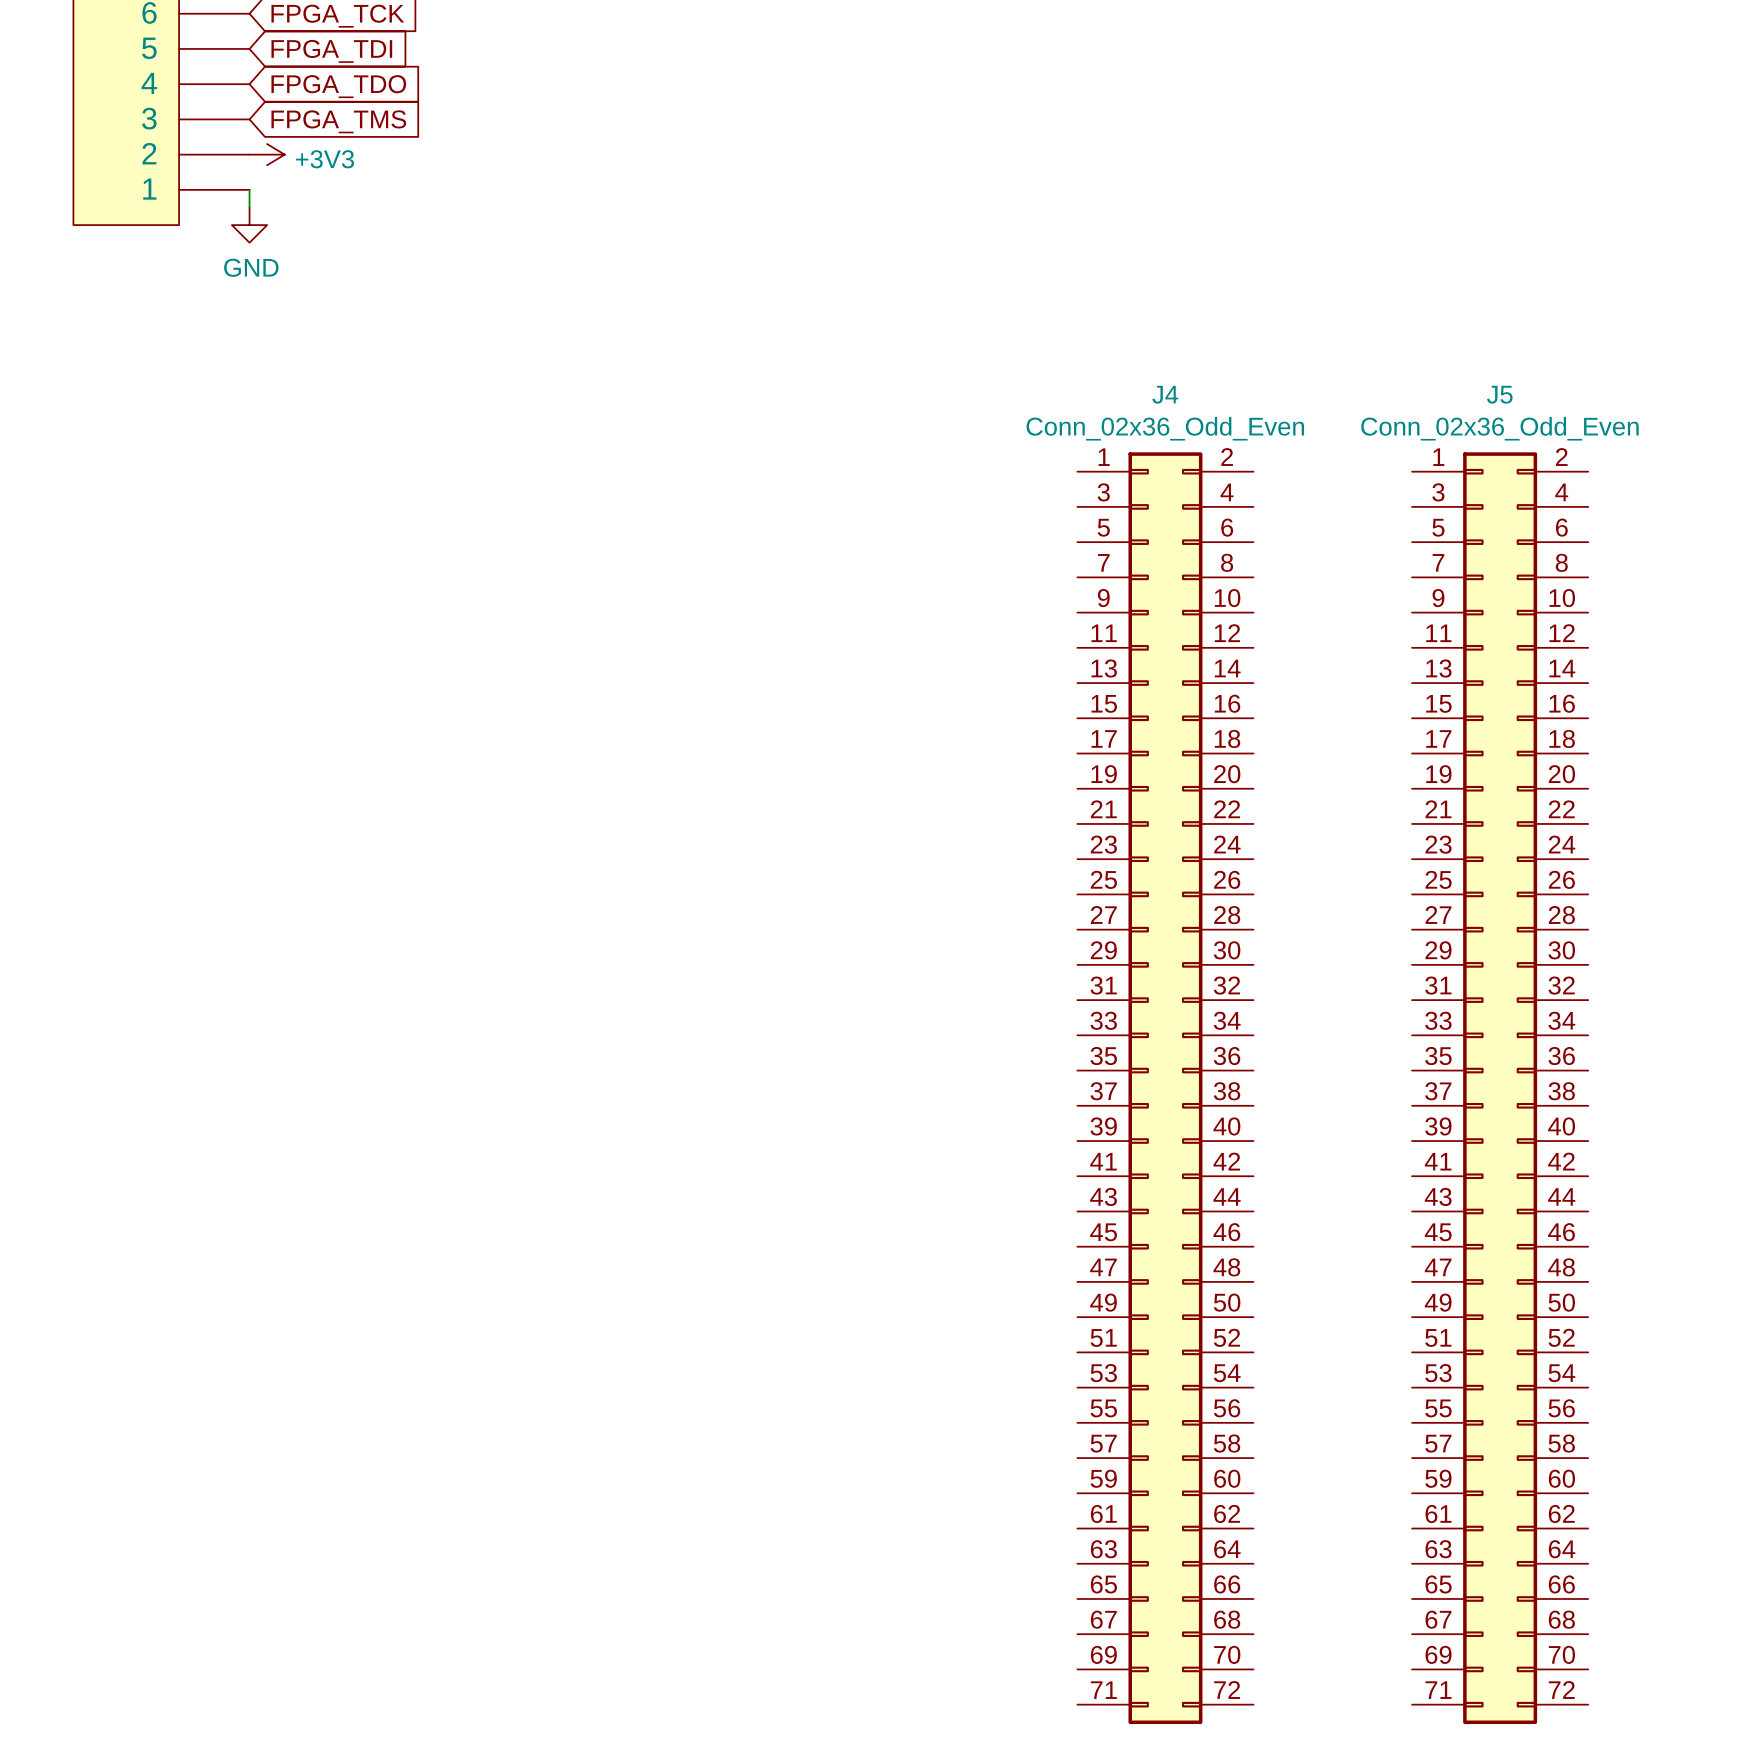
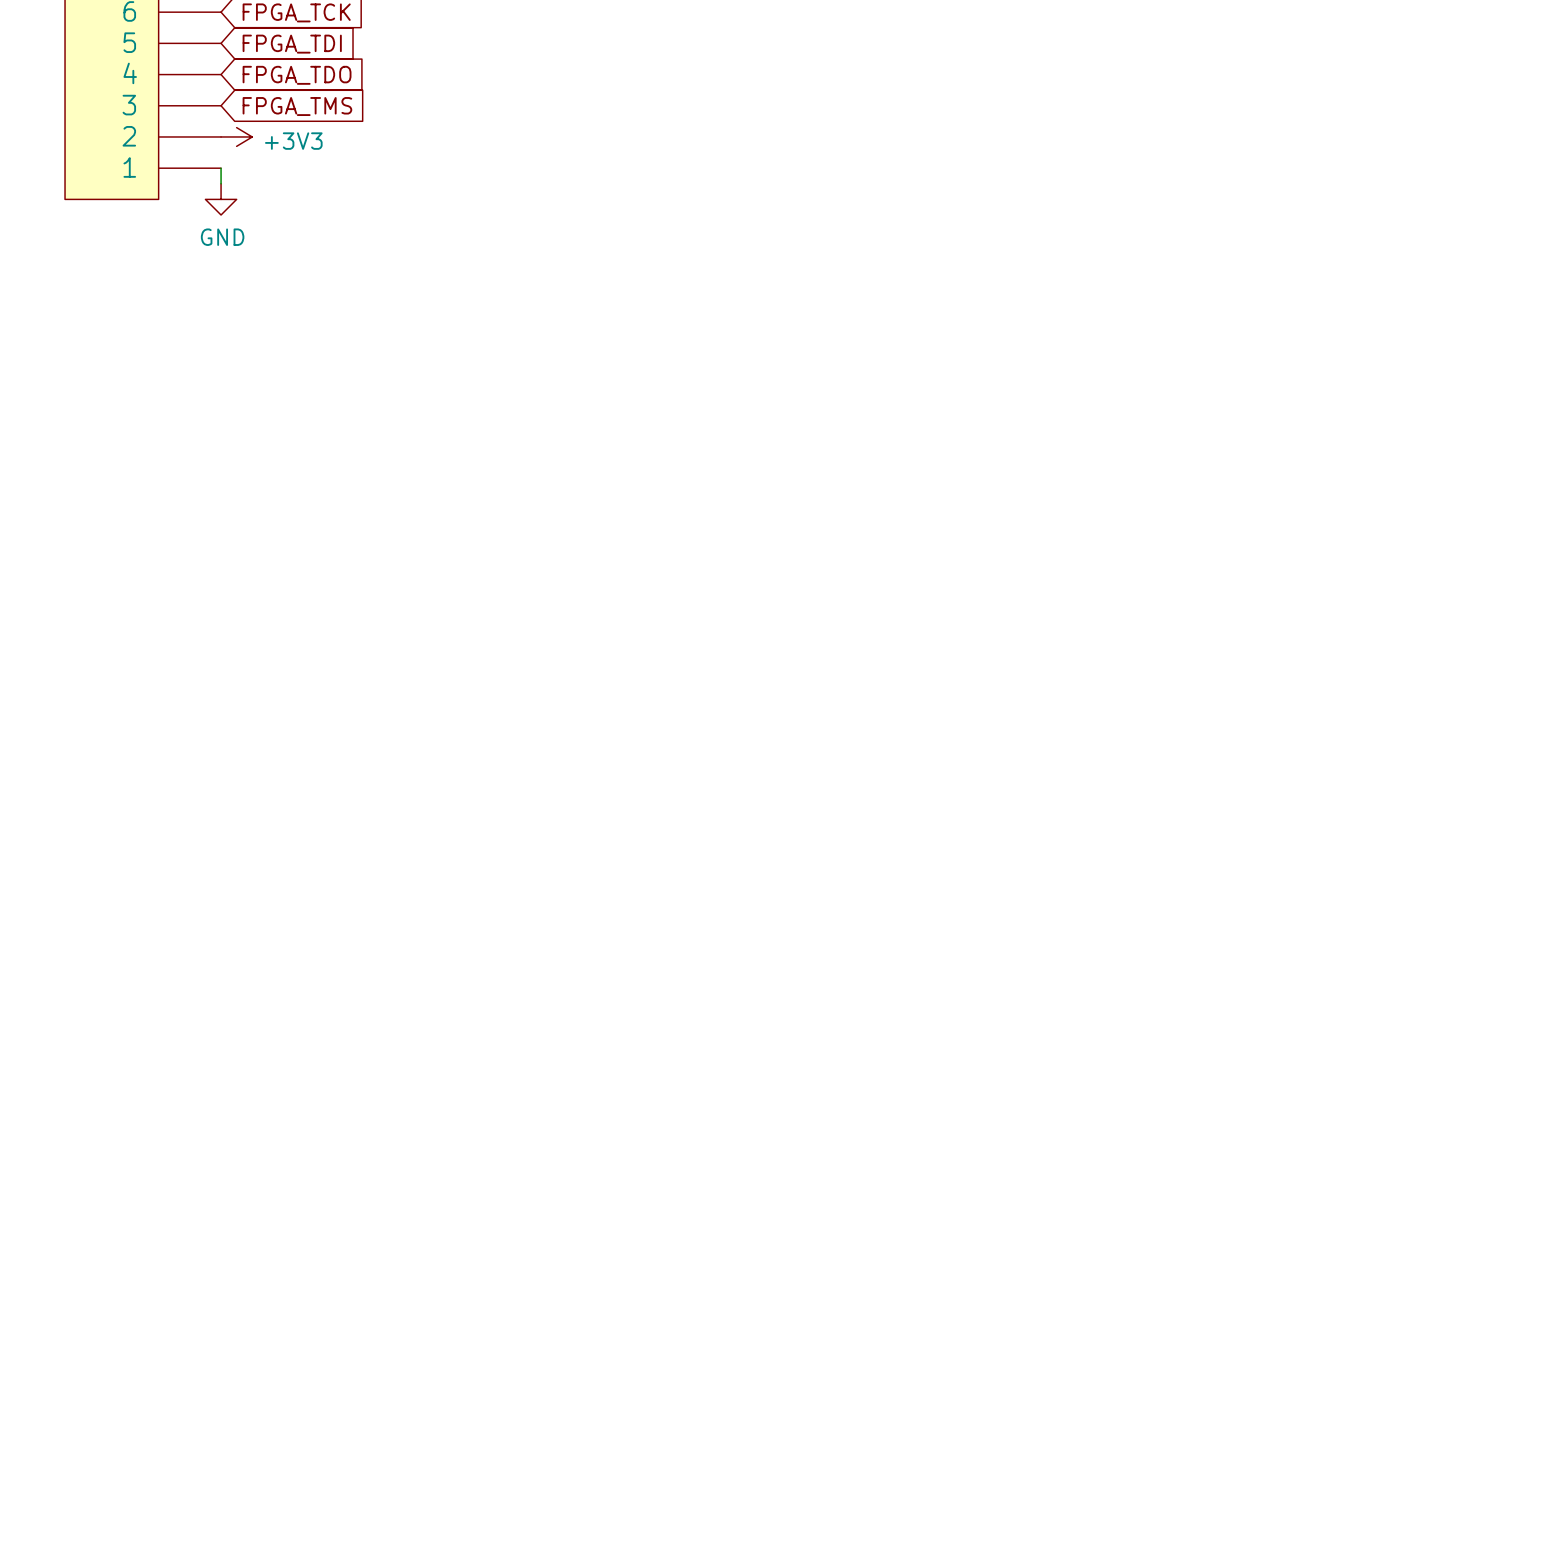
J4: Conn_02x36_Odd_Even (1165, 1088) -> none
J5: Conn_02x36_Odd_Even (1500, 1088) -> none

